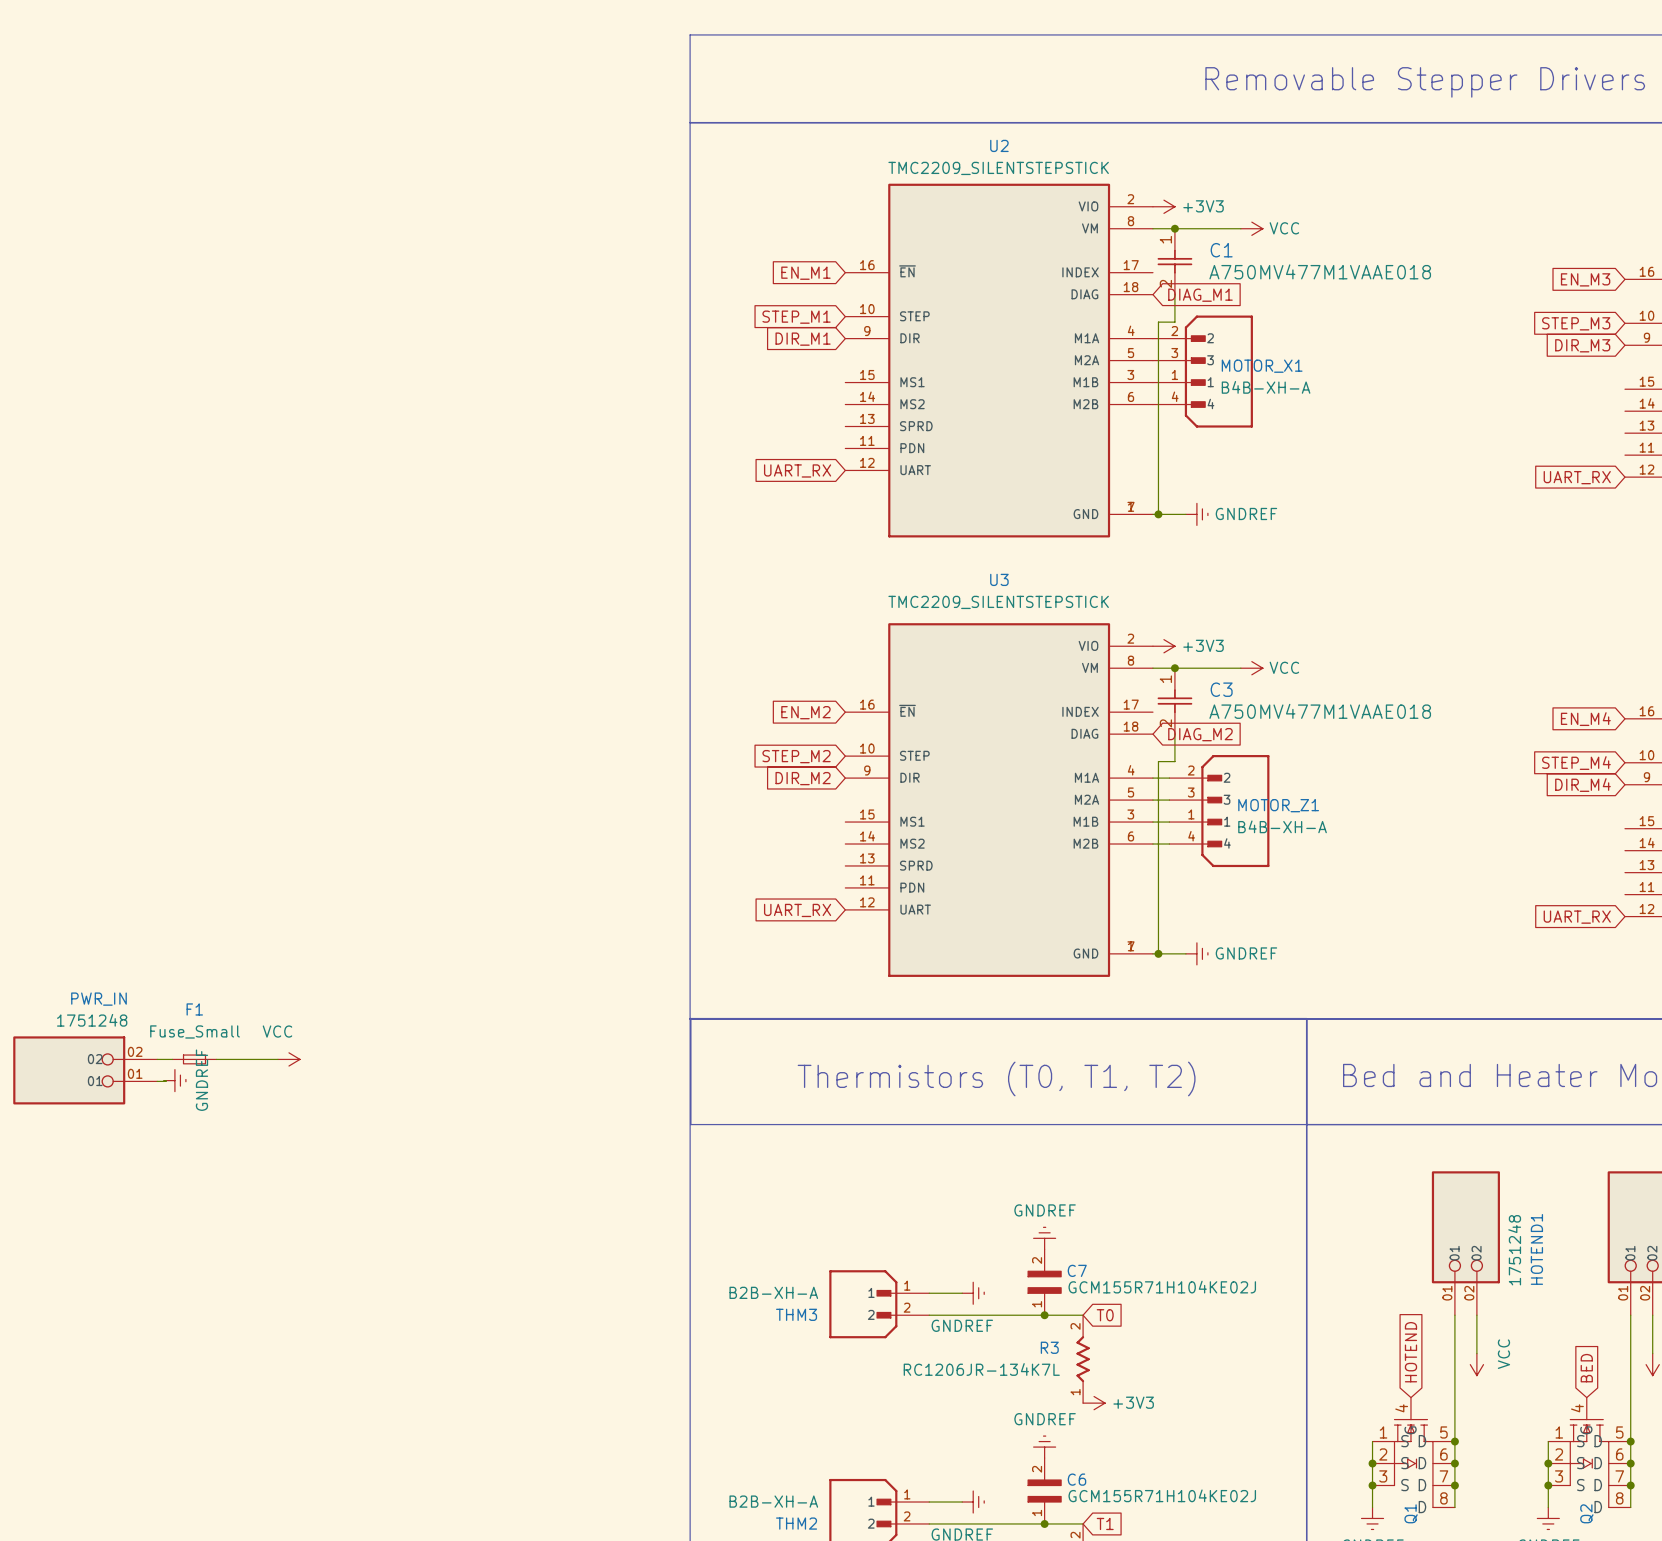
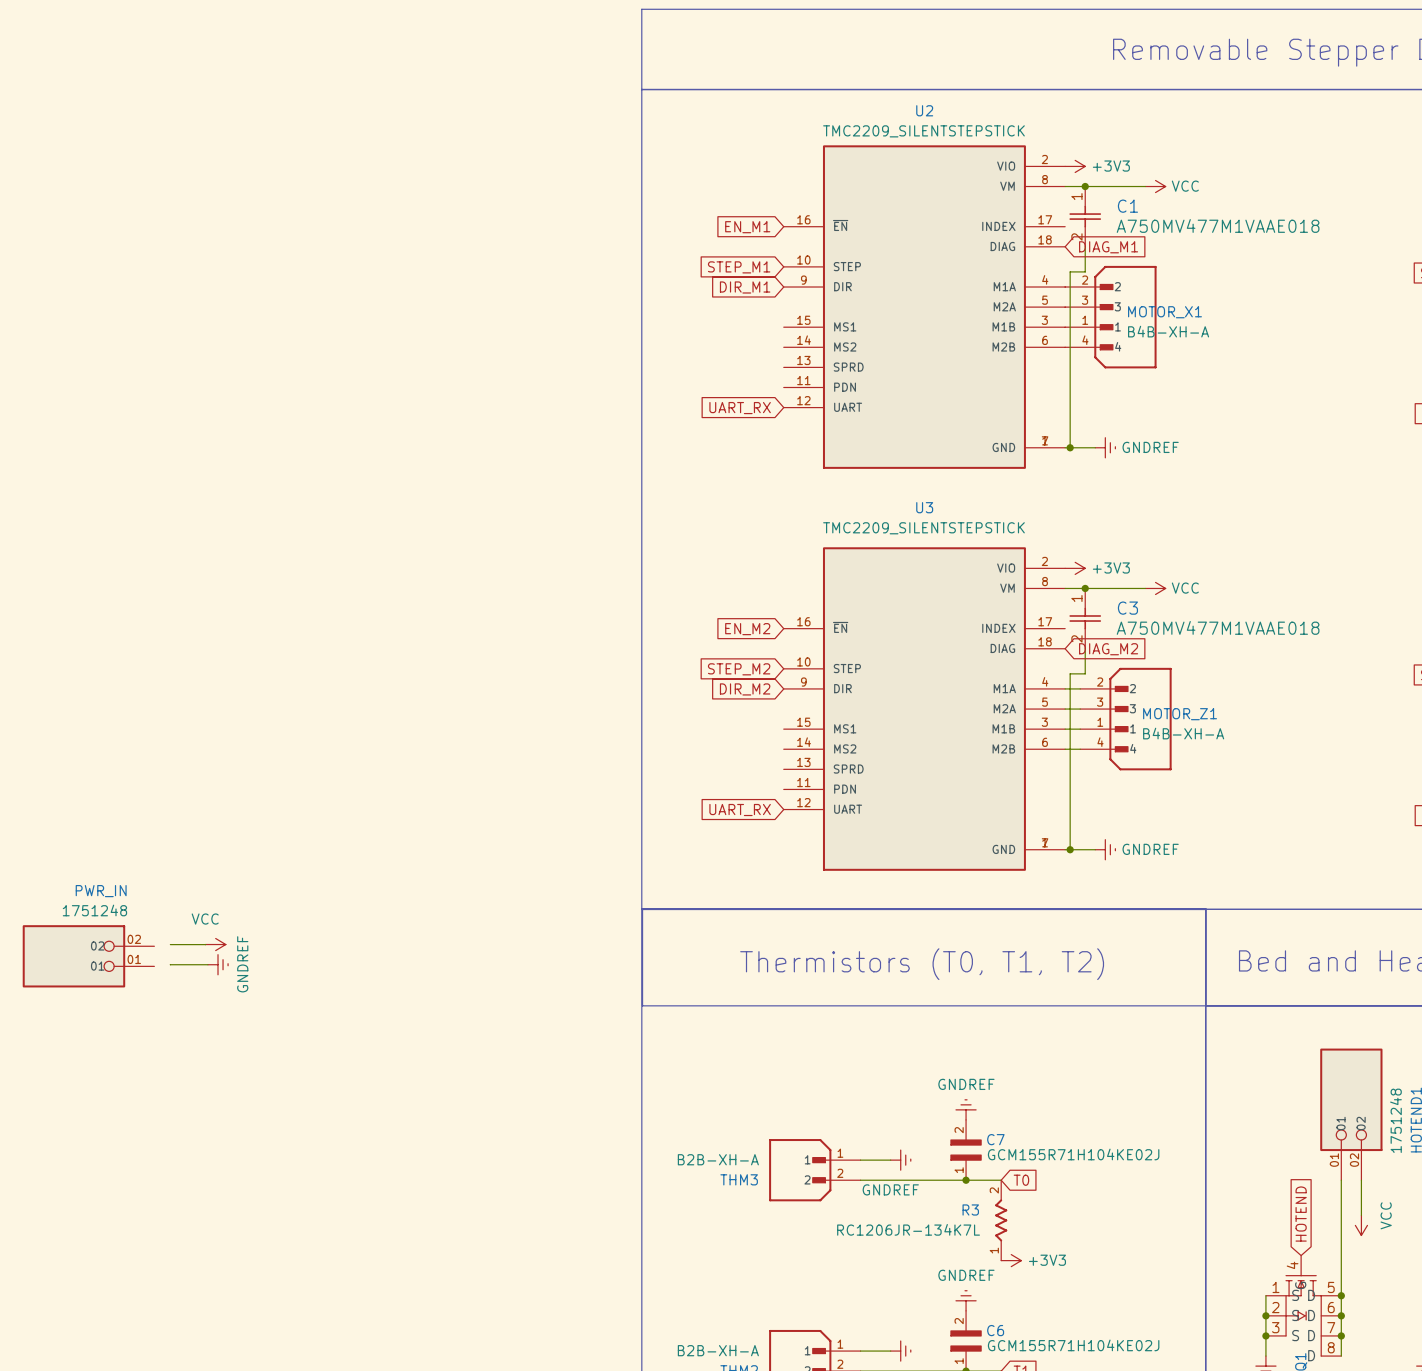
wire: none -> (170, 944) (205, 944)
wire: (157, 1059) (172, 1059) -> none
F1: Fuse_Small (194, 1059) -> none
wire: (216, 1059) (278, 1059) -> none
power symbol position: VCC (288, 1059) -> VCC (215, 944)
wire: none -> (170, 964) (207, 964)
wire: (163, 1080) (165, 1081) (157, 1081) -> none
power symbol position: GNDREF (174, 1080) -> GNDREF (218, 964)

